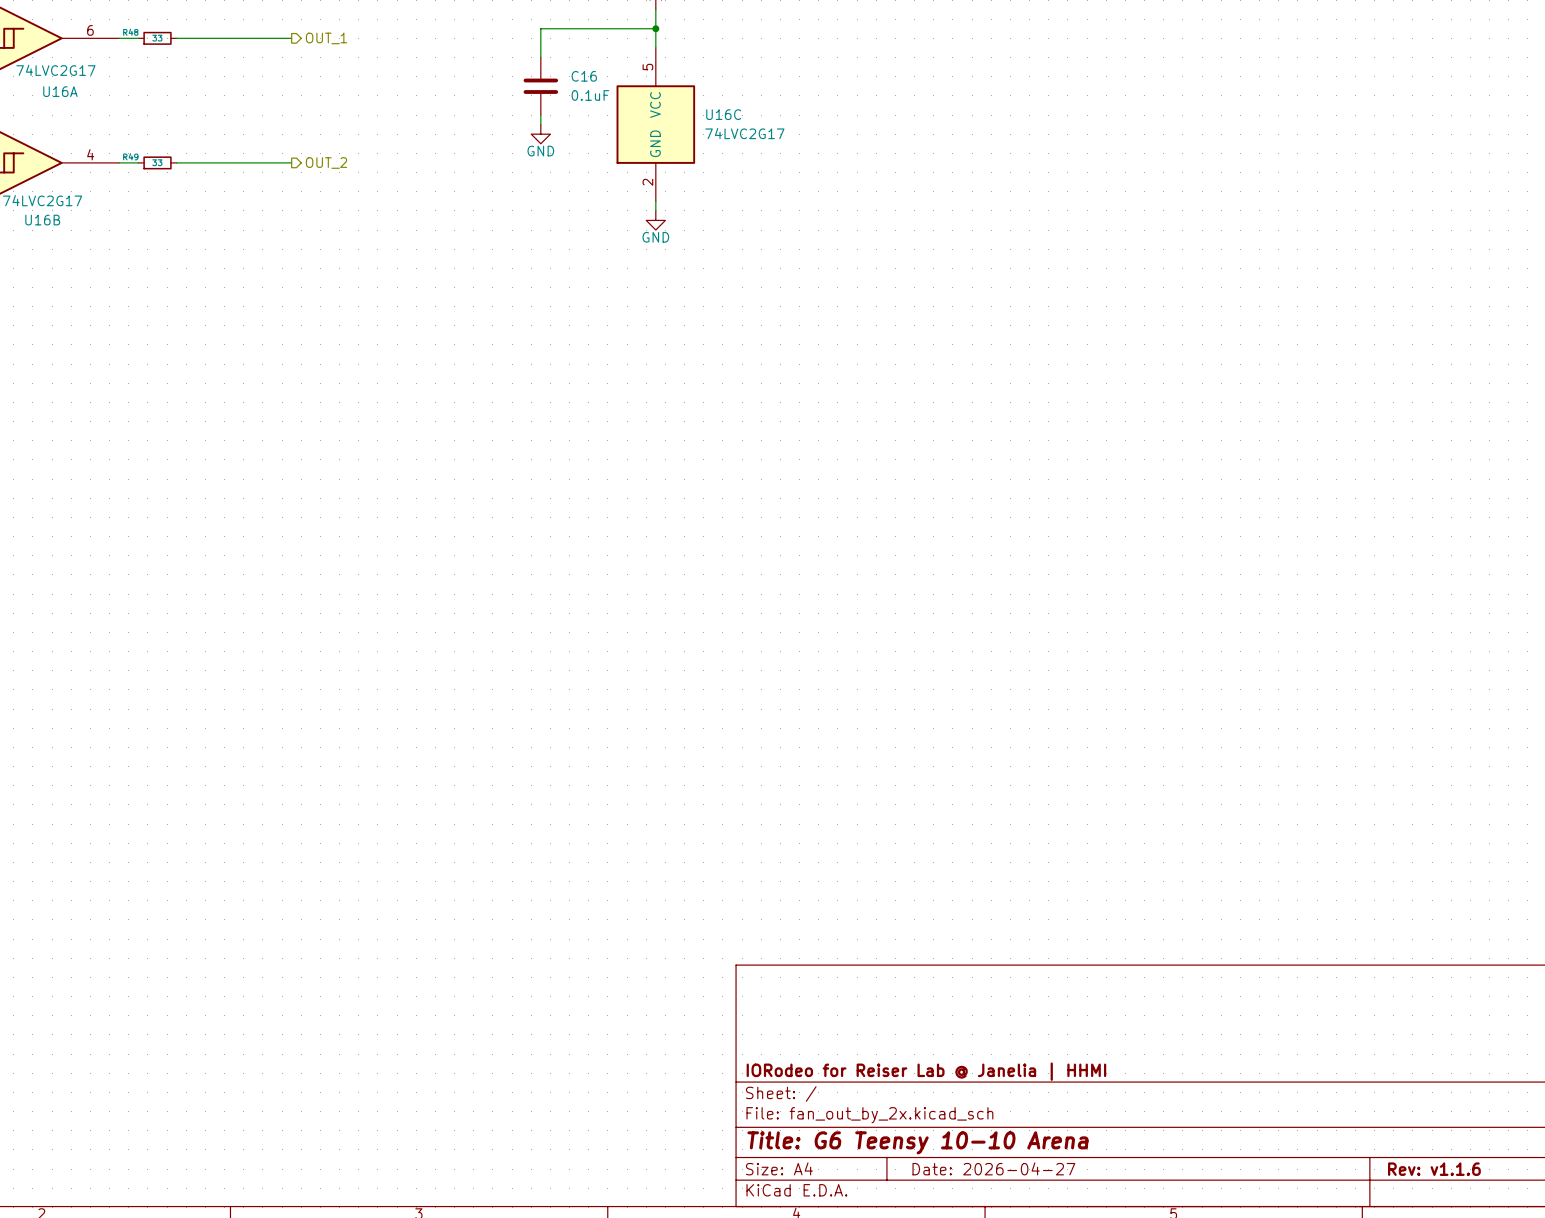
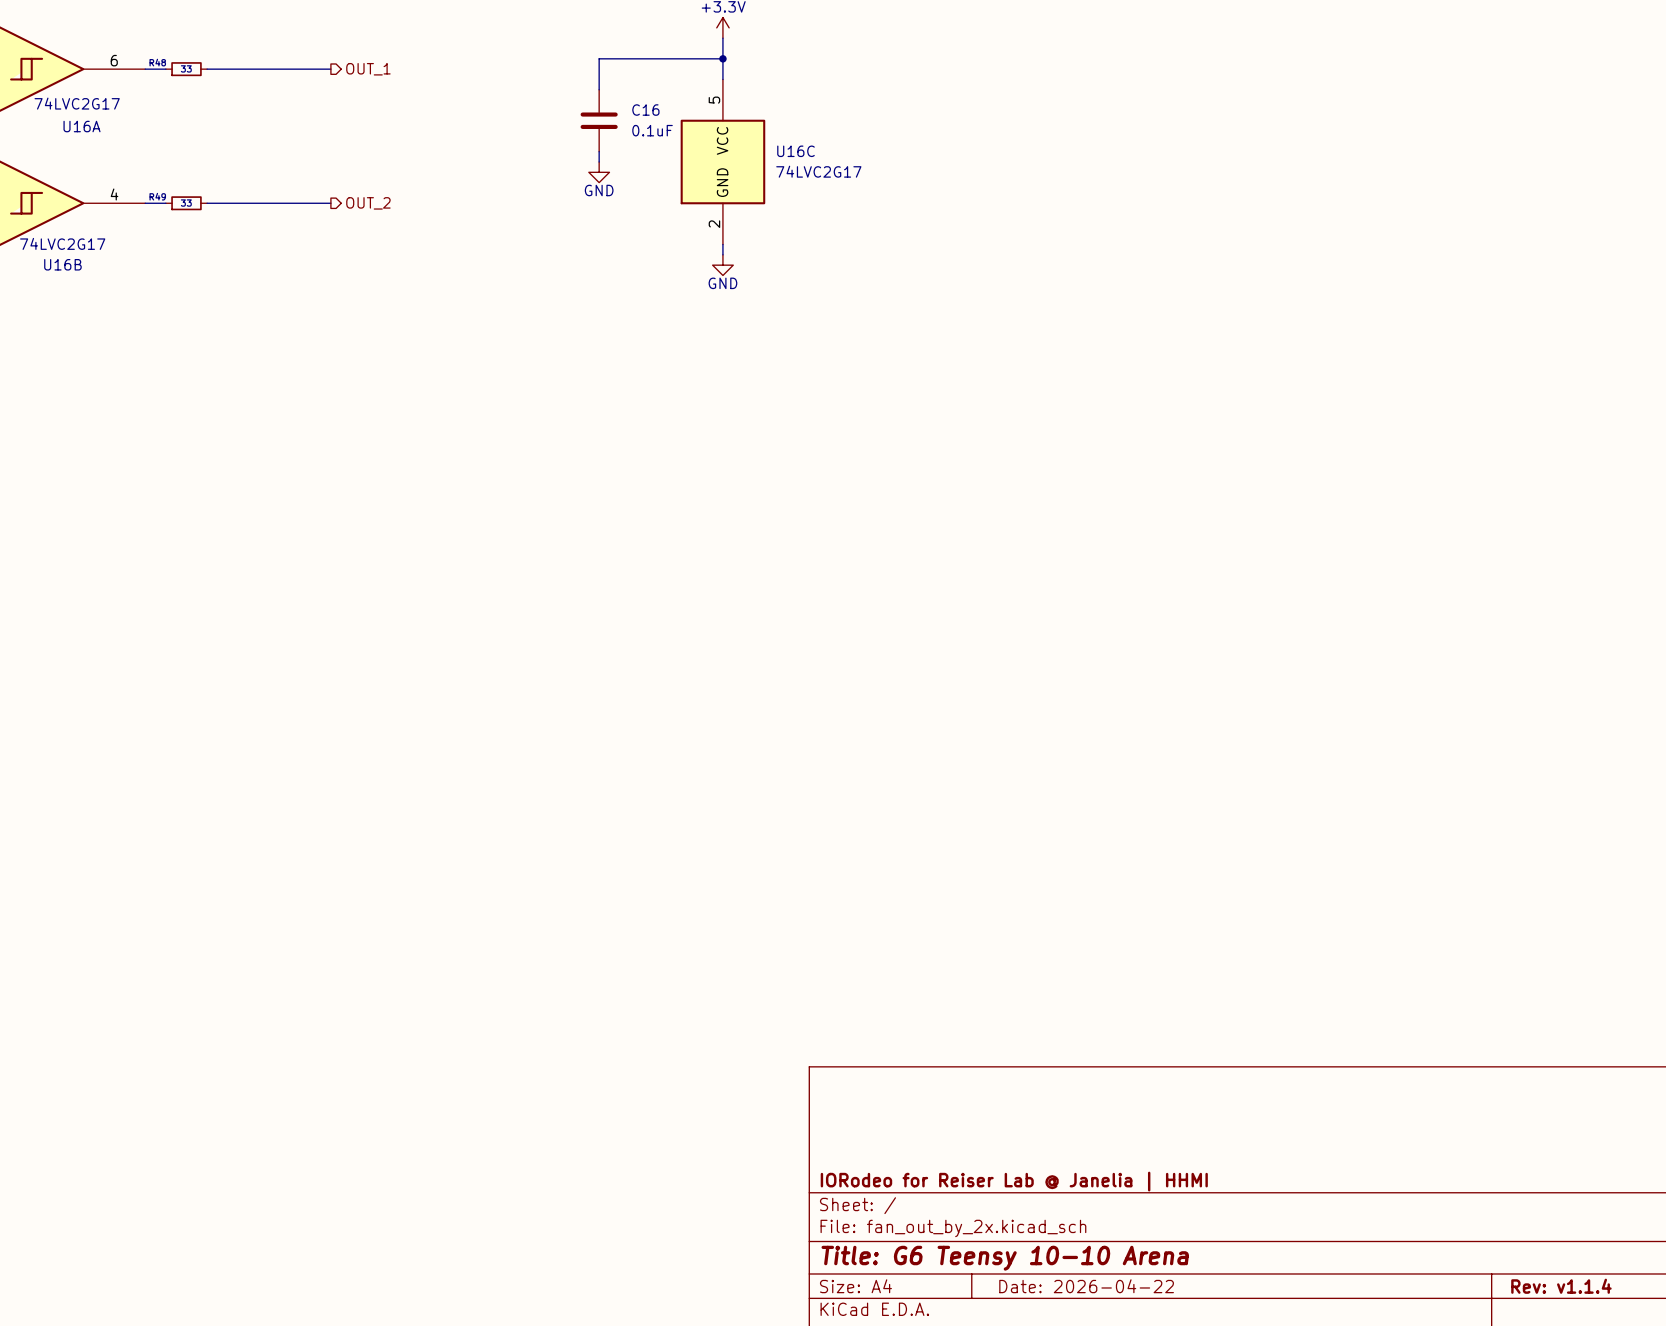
title block: Date: 2026-04-27 (993, 1168) -> Date: 2026-04-22 (1086, 1286)
title block: Rev: v1.1.6 (1434, 1169) -> Rev: v1.1.4 (1561, 1286)

